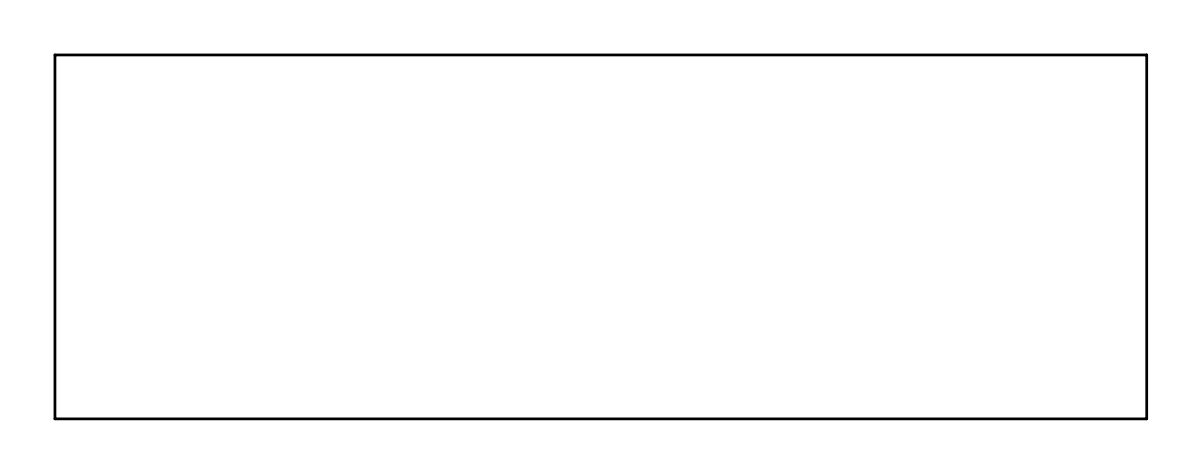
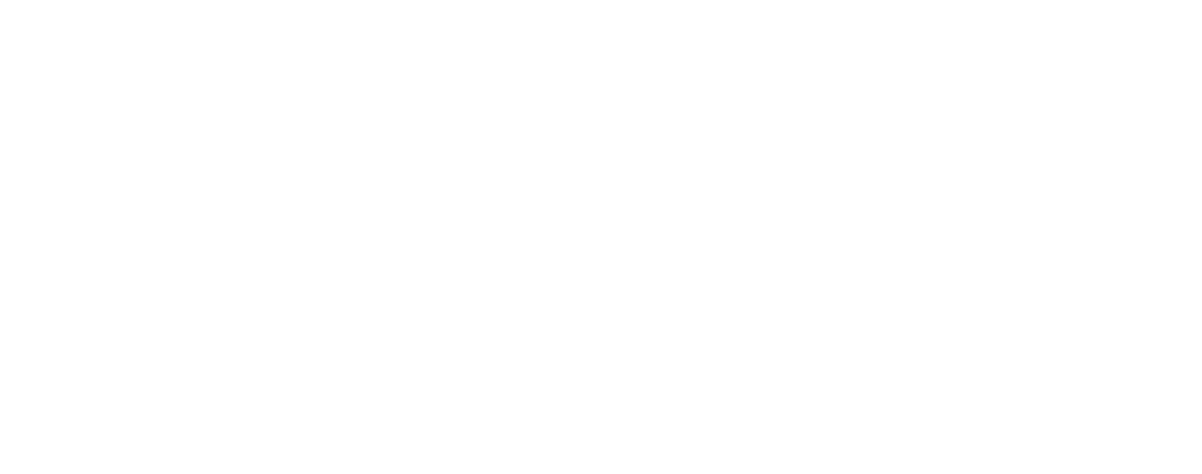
board edge: (54, 54) (54, 418) (1146, 418) (1146, 54) (54, 54) -> none

